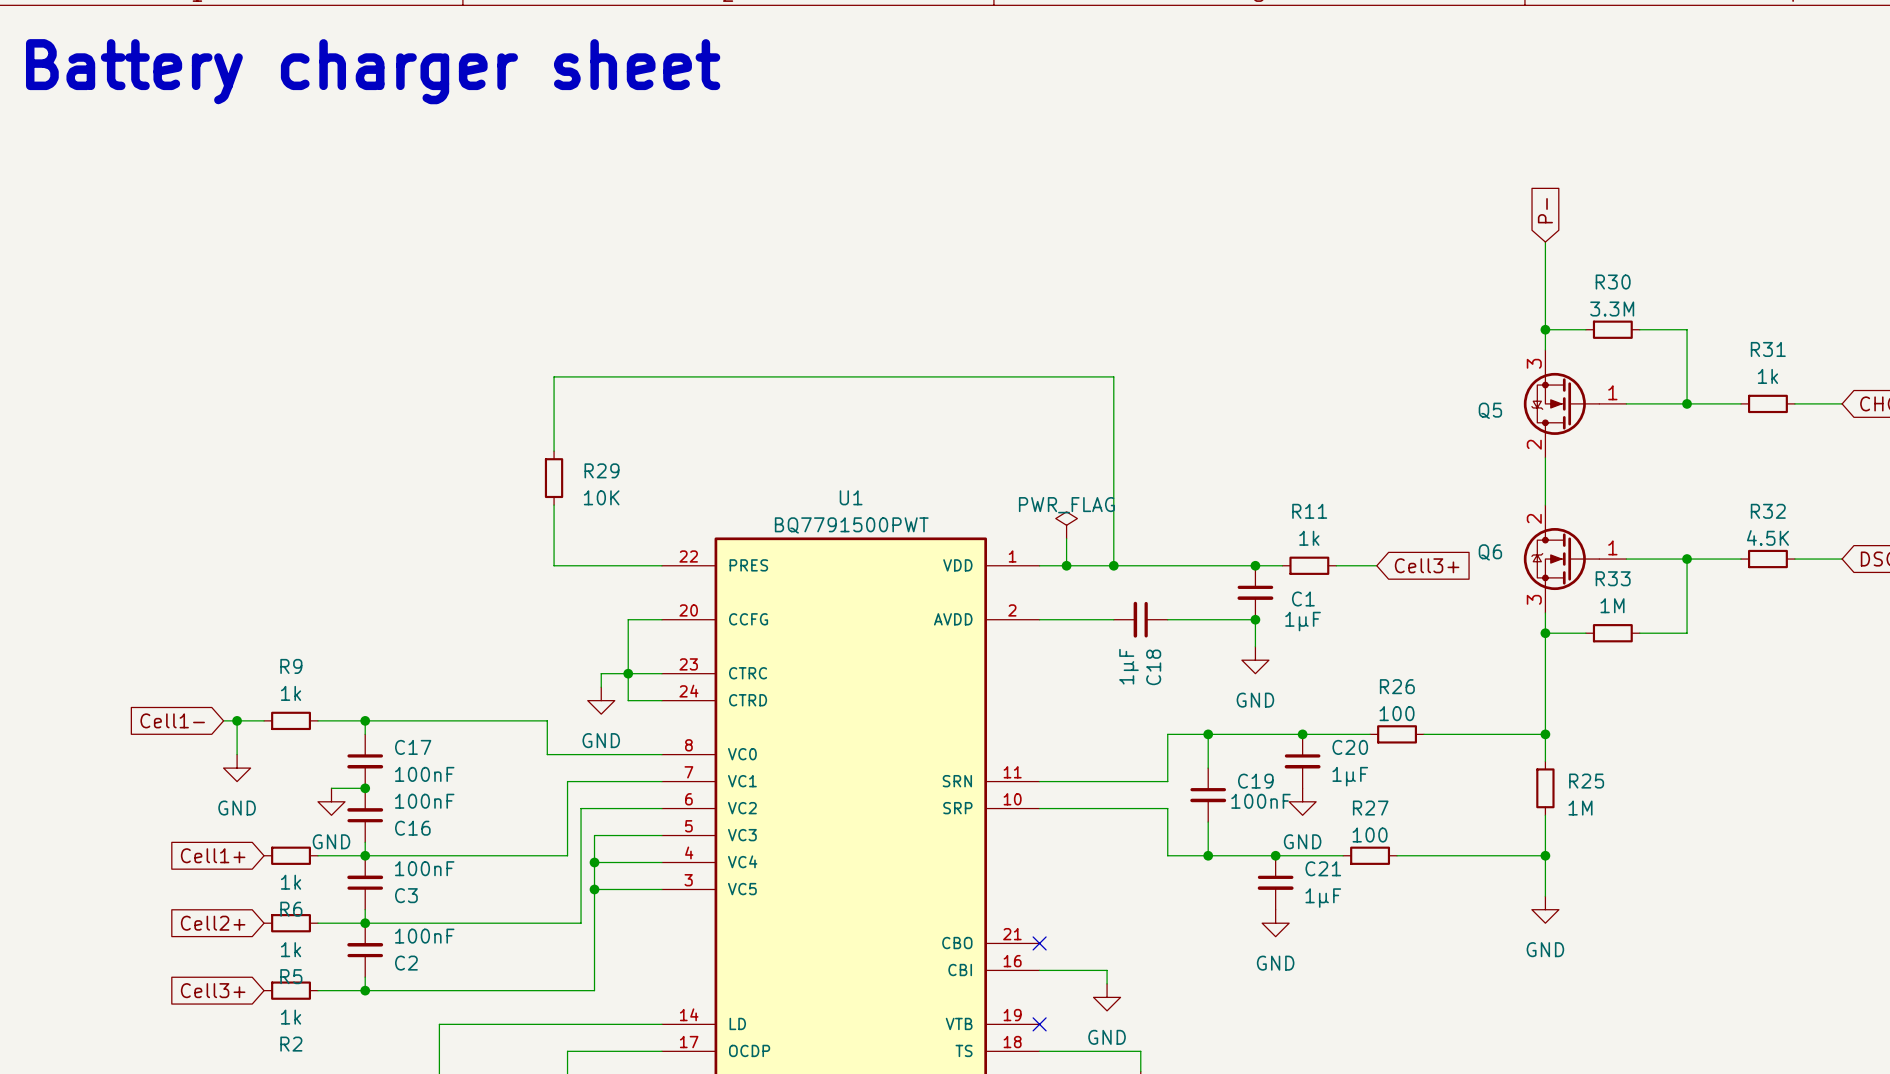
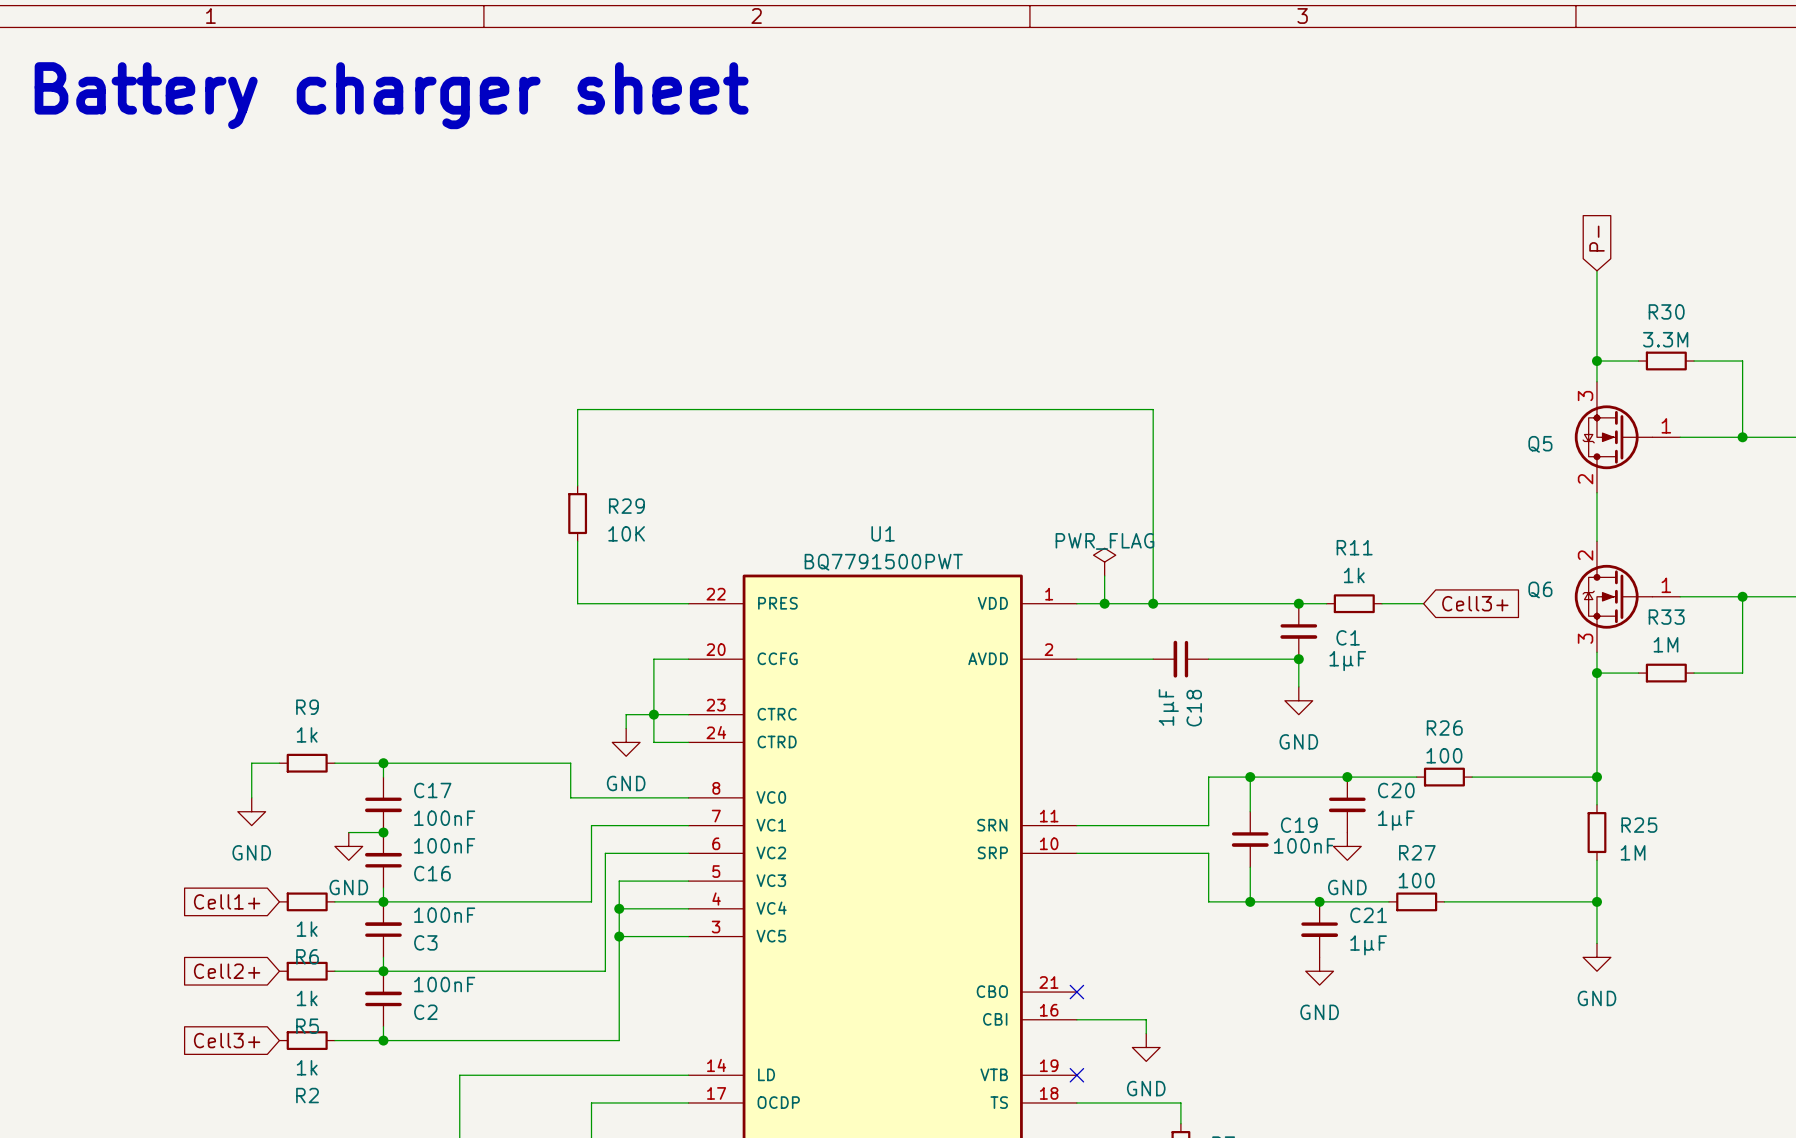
global label: Cell1- (172, 720) -> none
wire: (223, 720) (237, 720) -> none
junction: (237, 720) -> none

